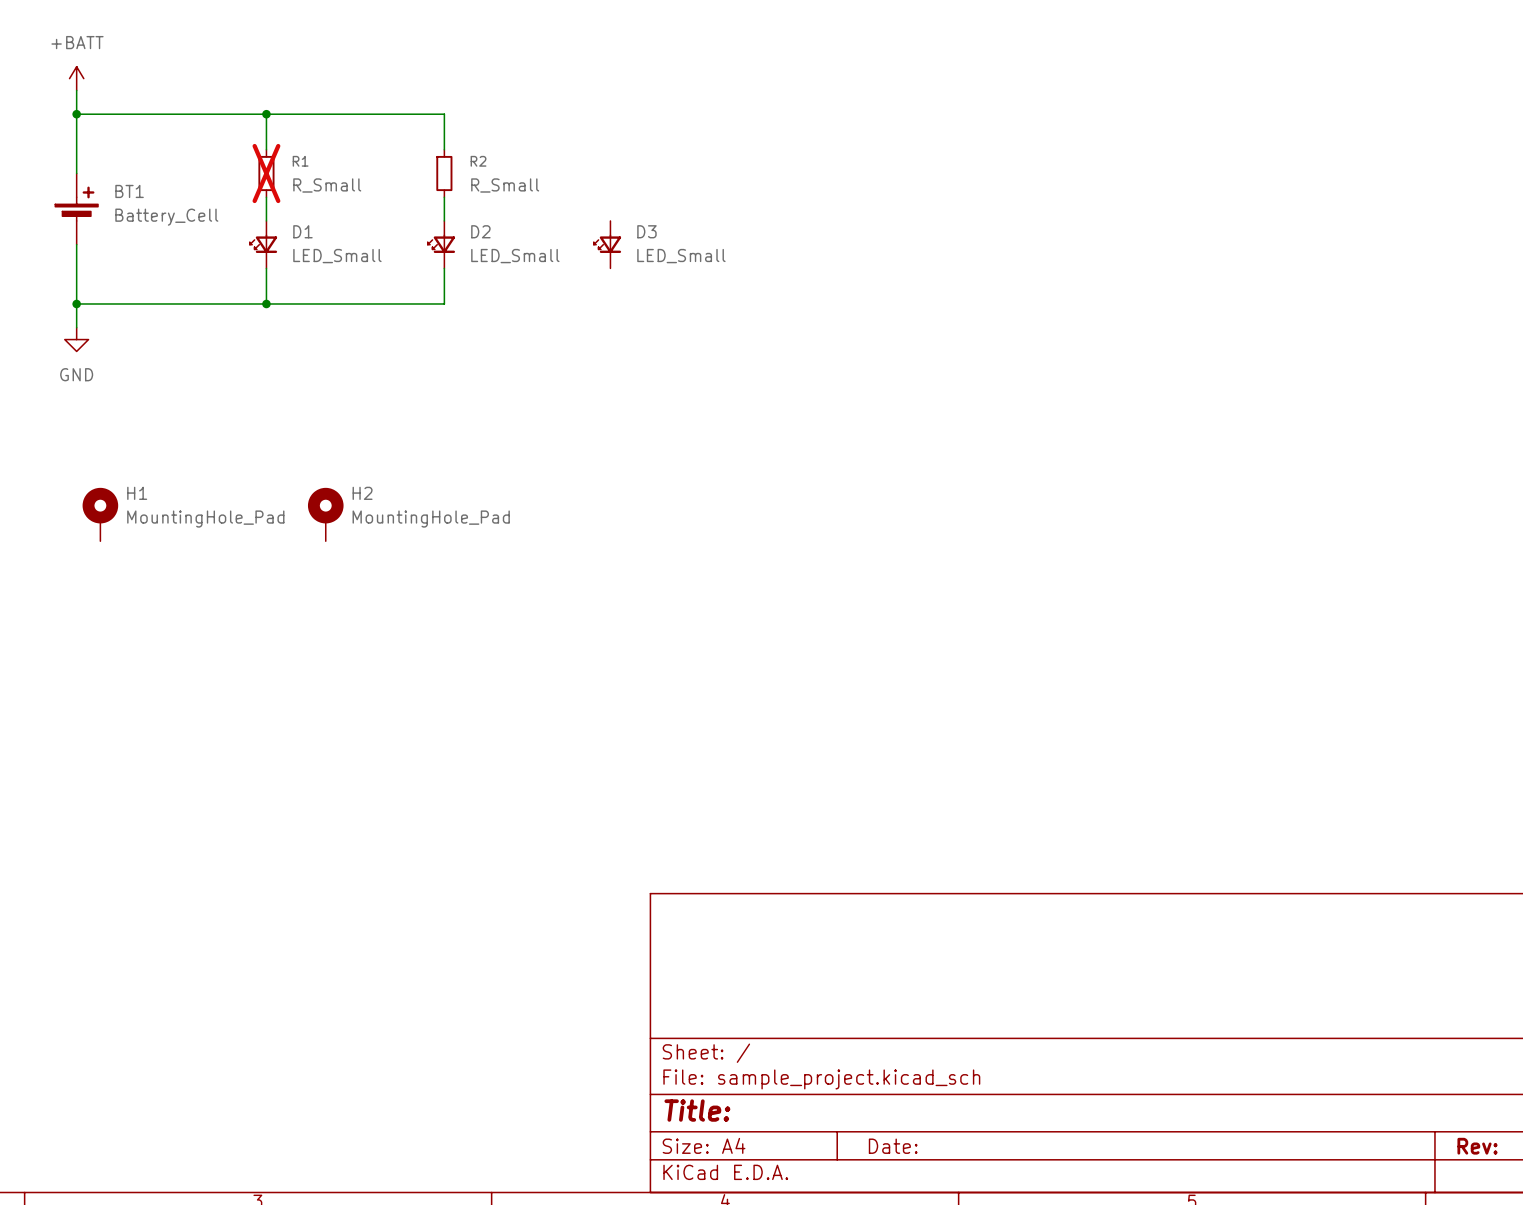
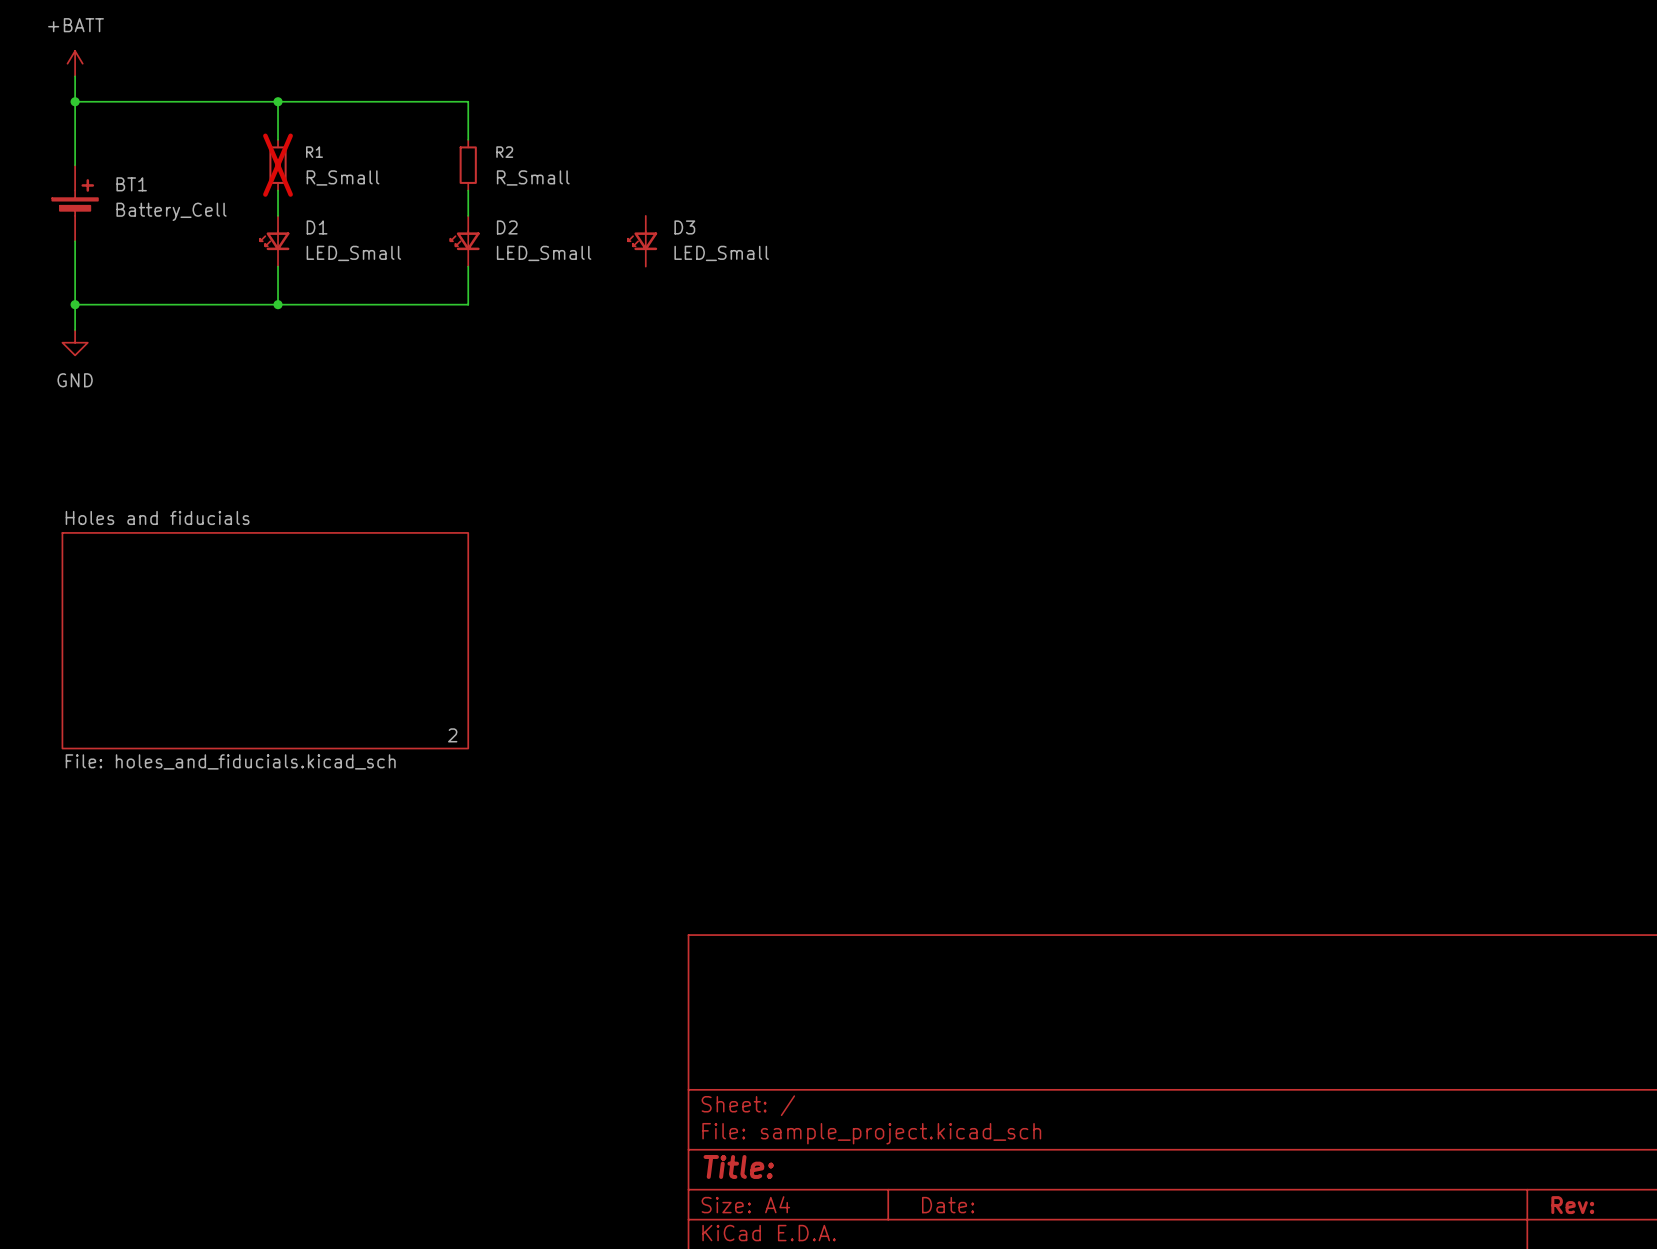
H1: MountingHole_Pad (100, 514) -> none
H2: MountingHole_Pad (325, 514) -> none
sheet Holes and fiducials: none -> File: holes_and_fiducials.kicad_sch (265, 640)

